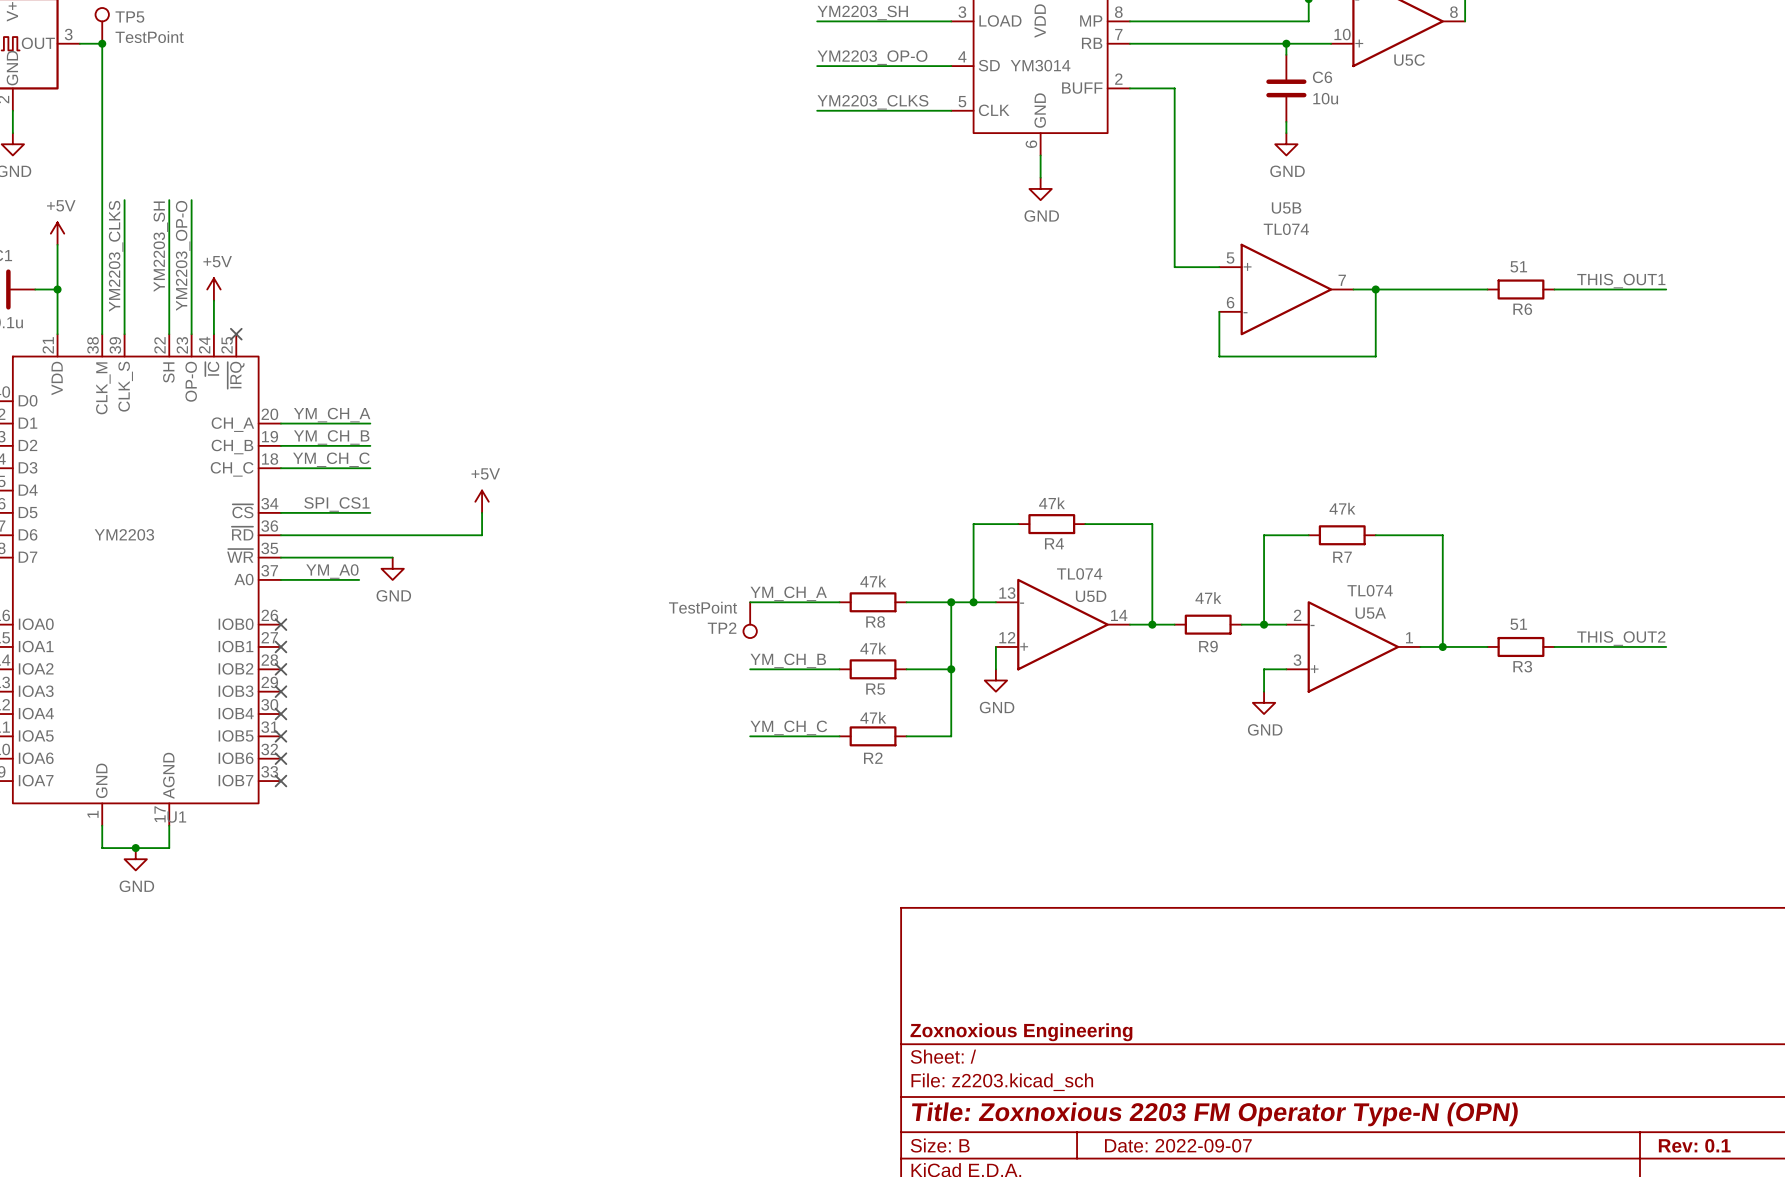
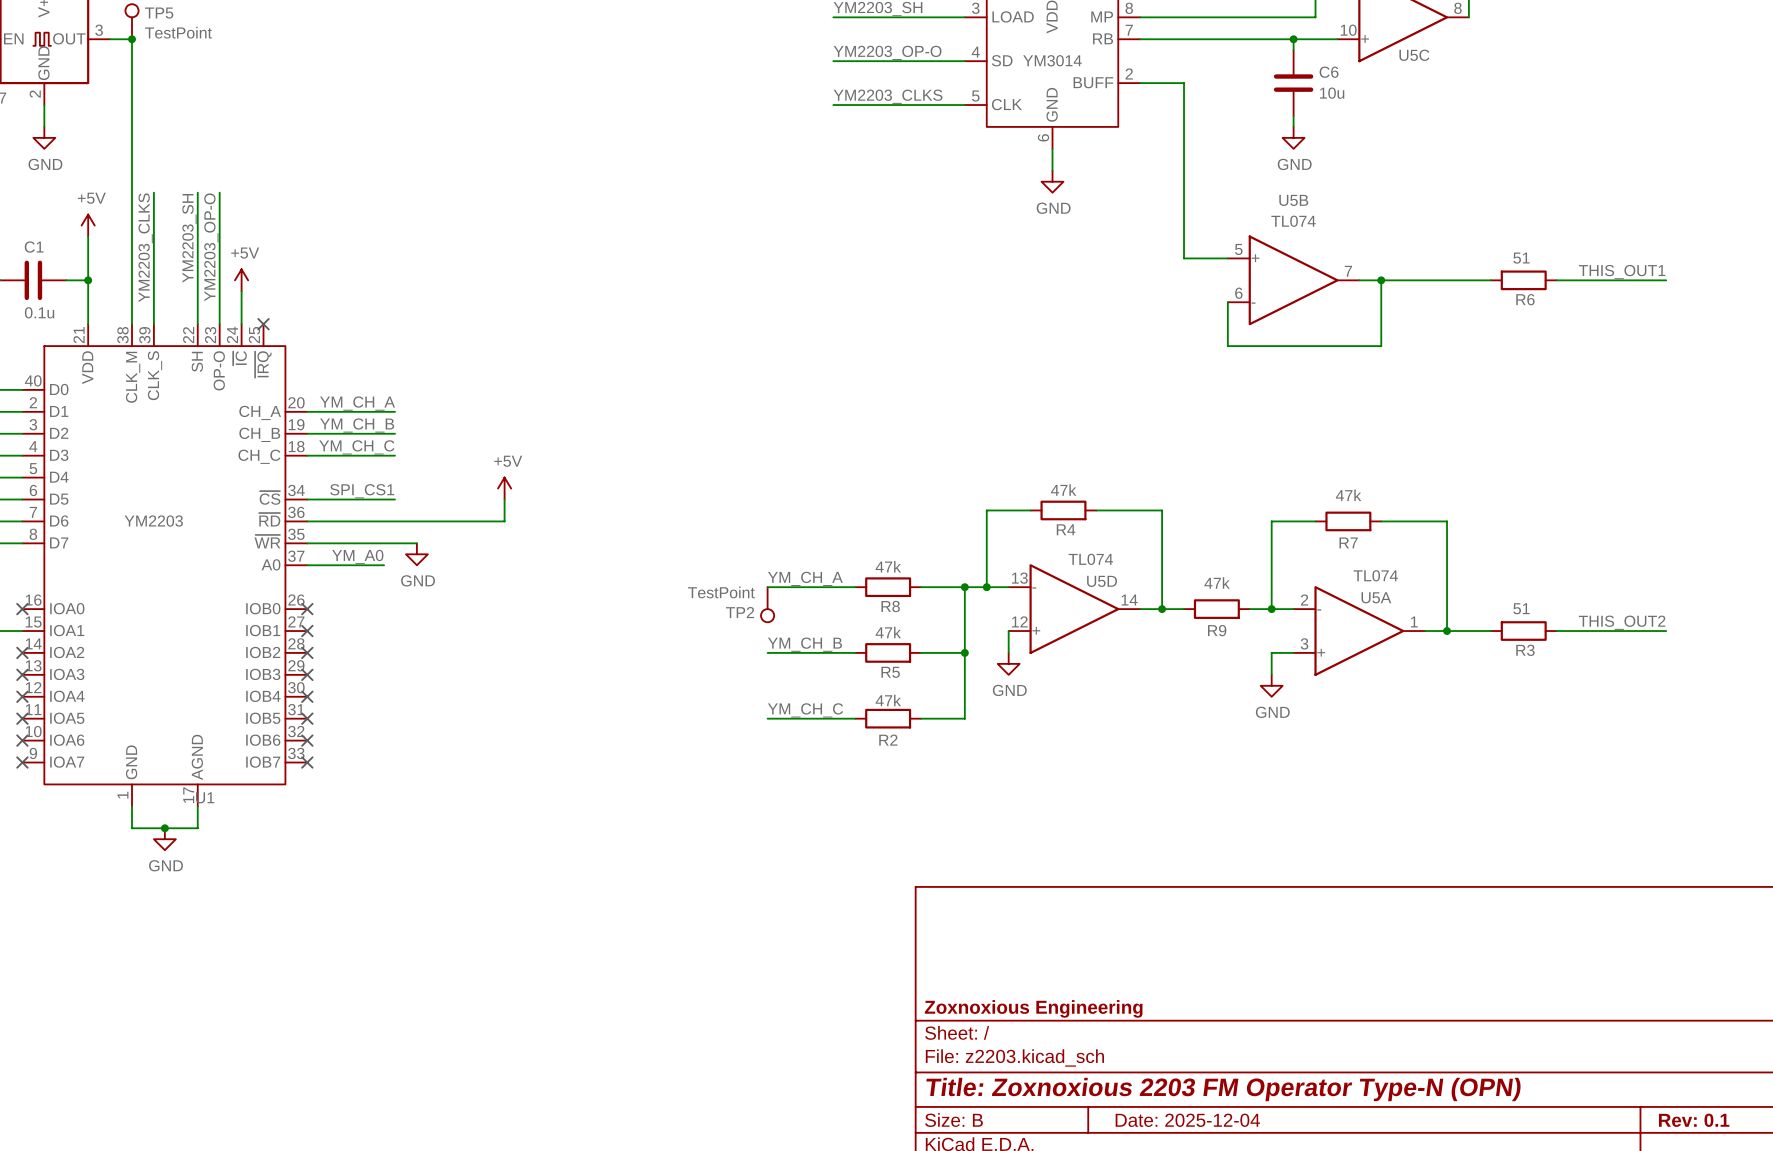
title block: Date: 2022-09-07 (1178, 1145) -> Date: 2025-12-04 (1187, 1120)

